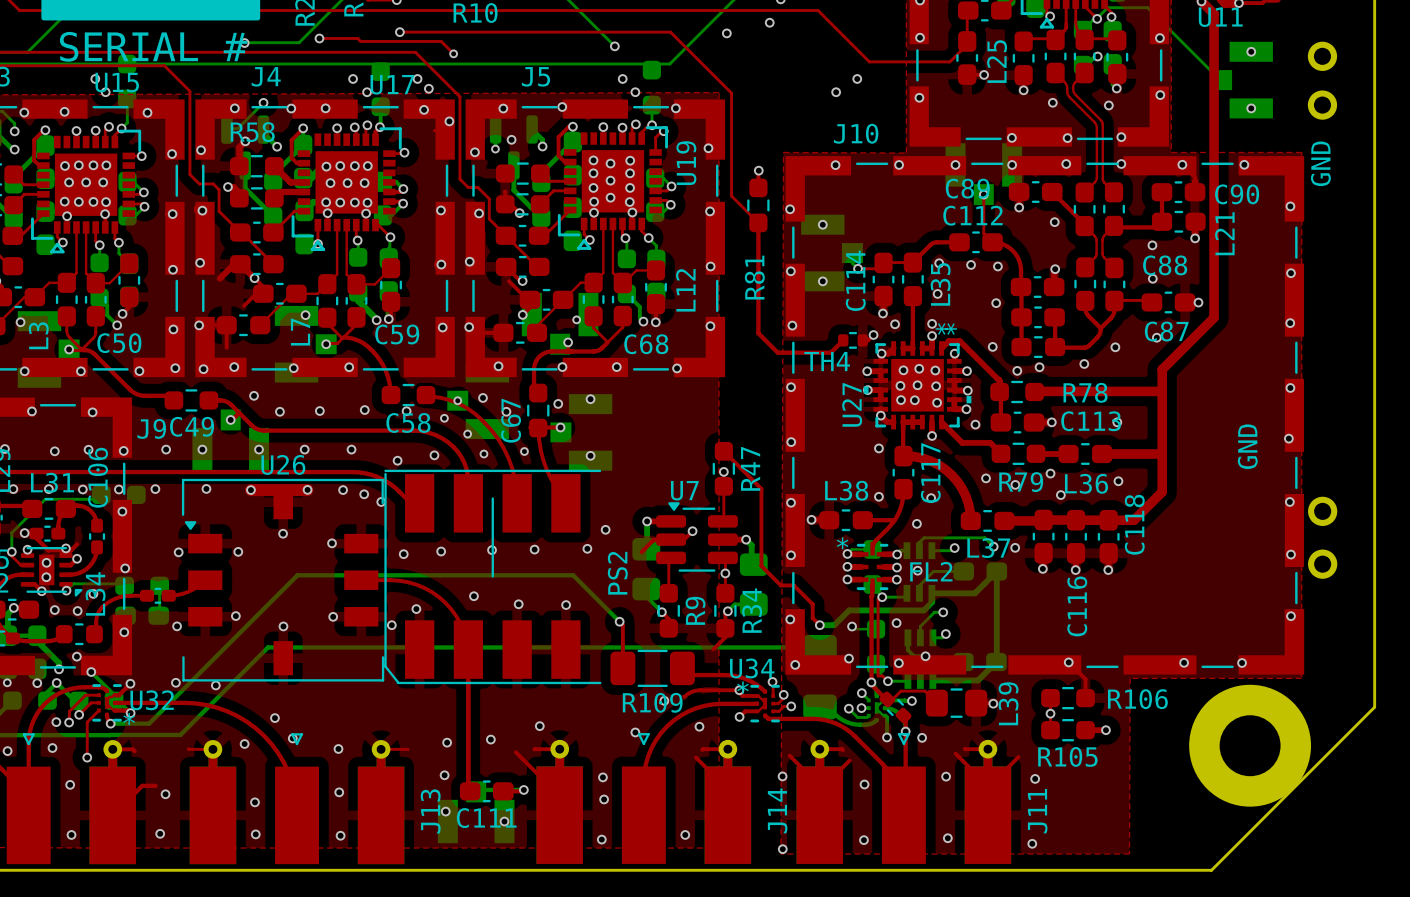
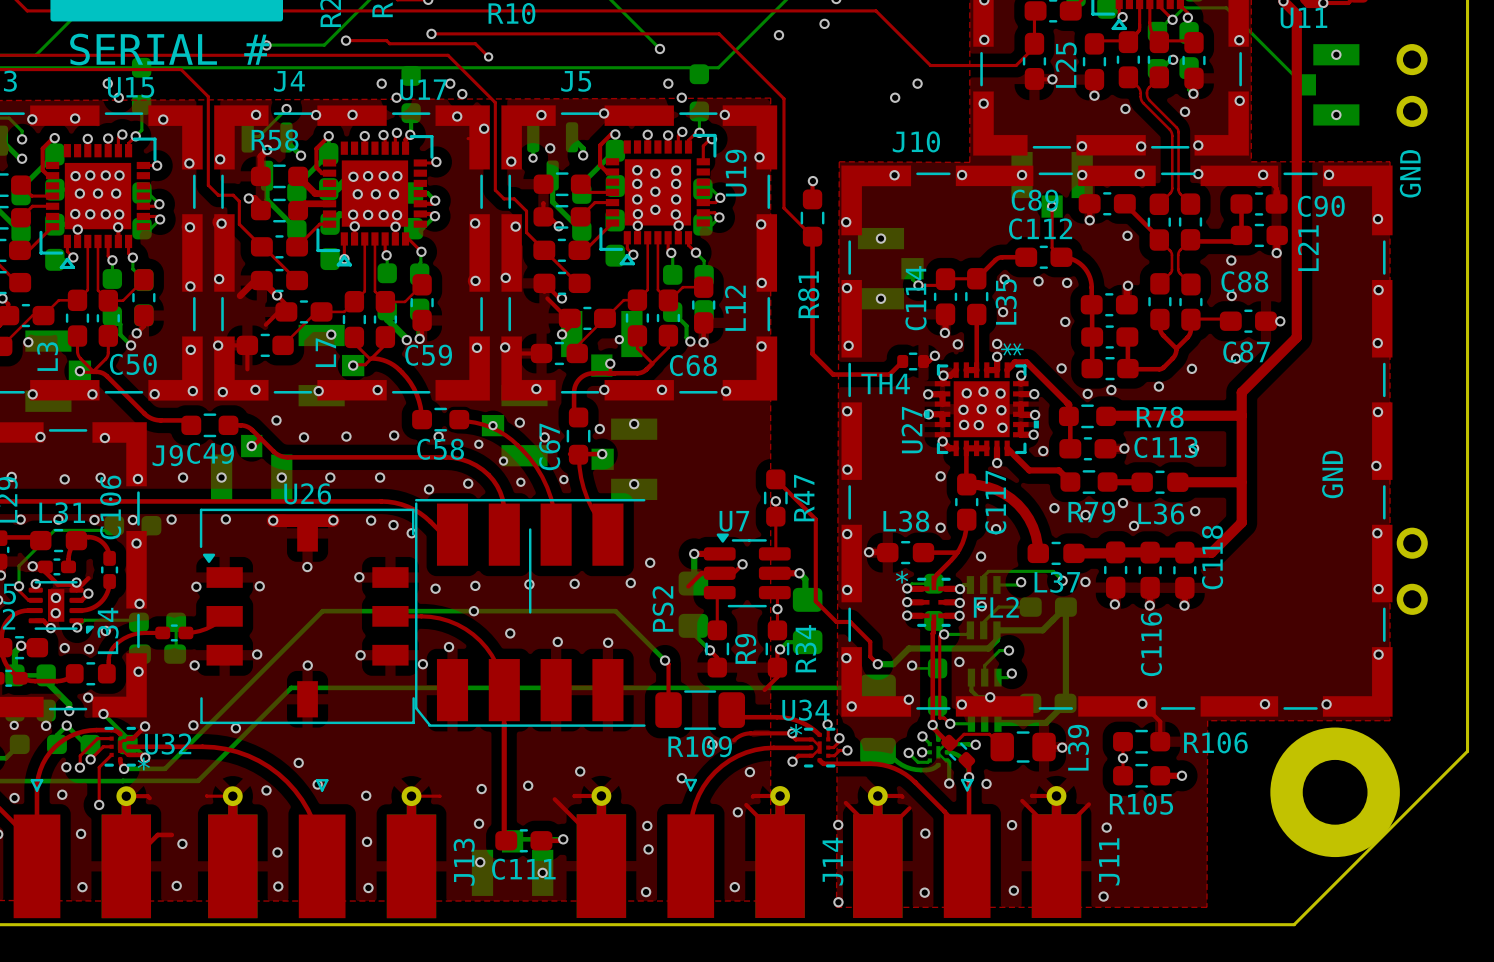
via: none -> (473, 611)
via: none -> (737, 812)

